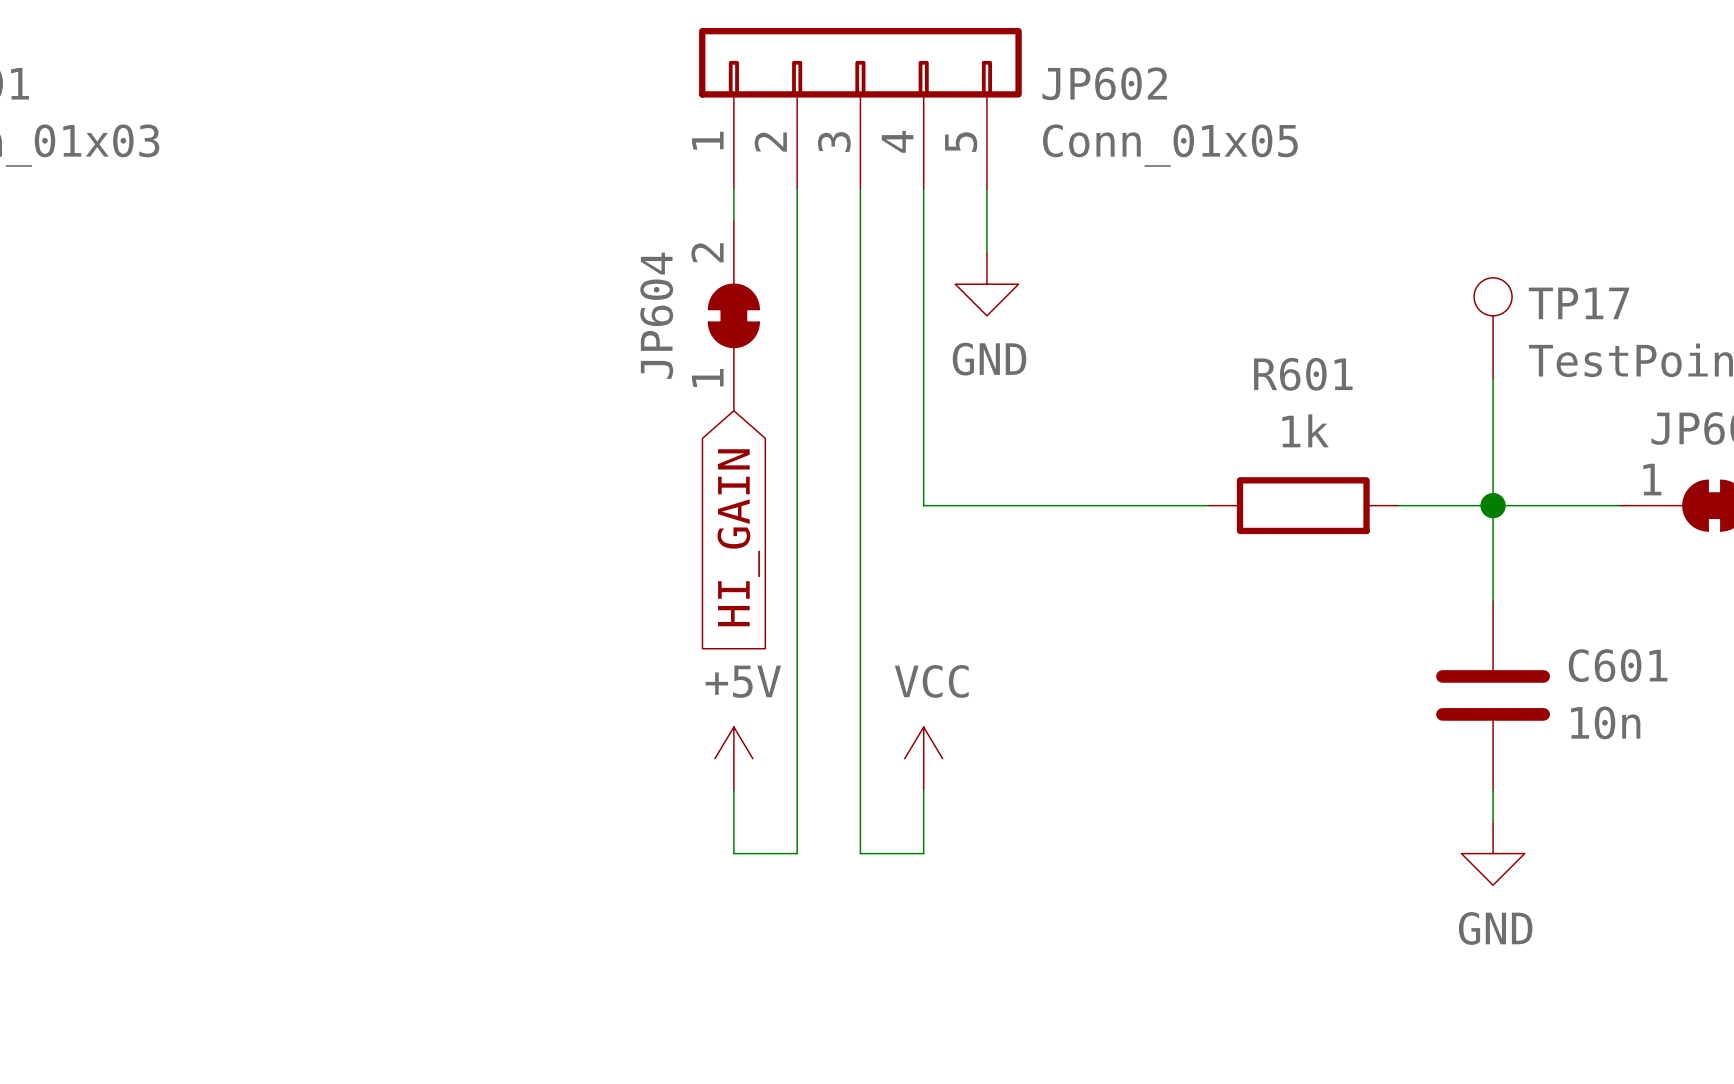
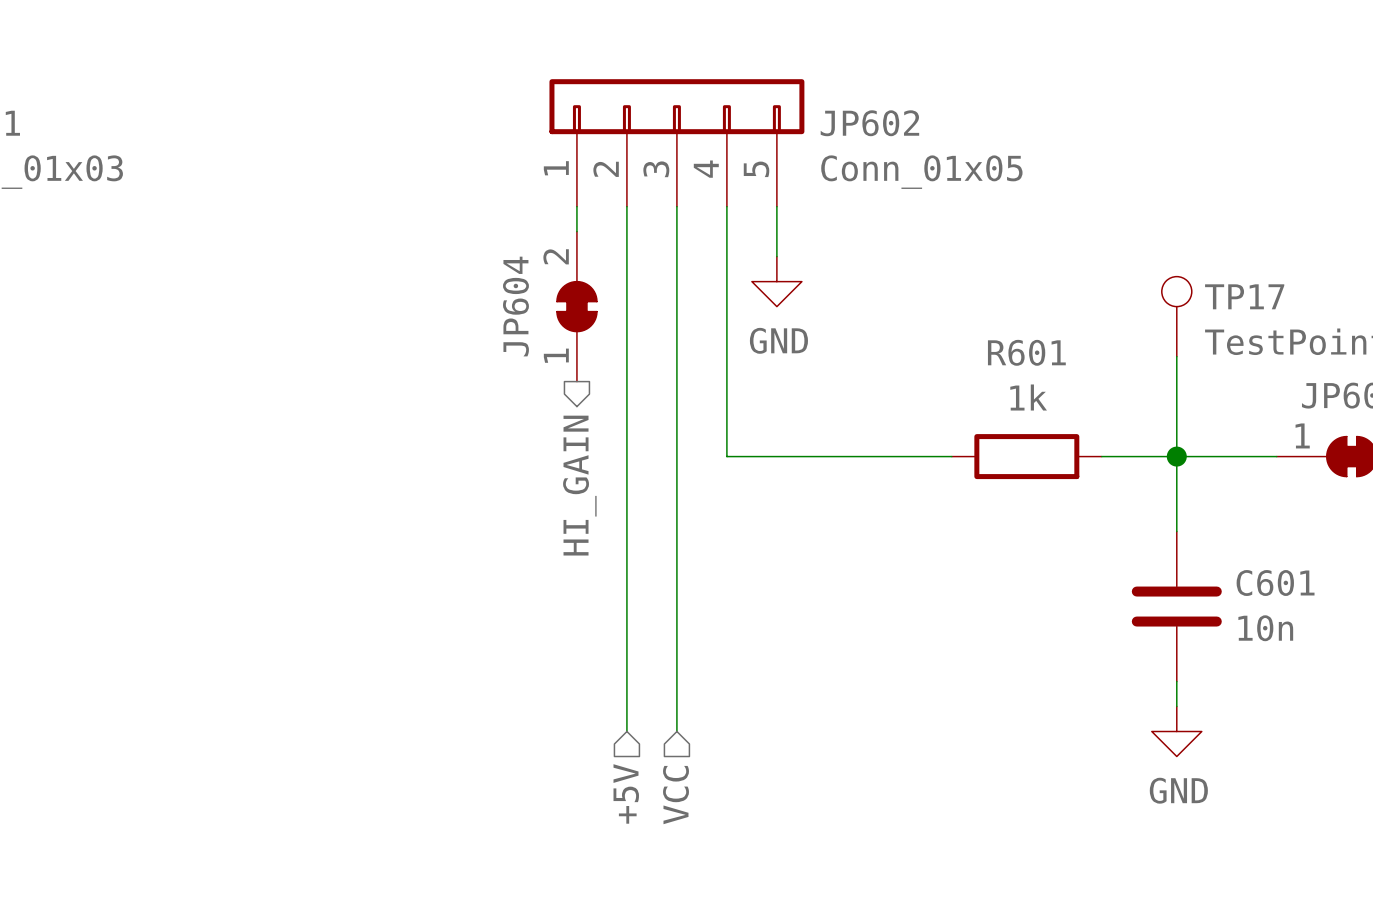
global label: HI_GAIN (738, 537) -> none
hierarchical label: none -> HI_GAIN (579, 485)
power symbol: +5V (733, 758) -> none
power symbol: VCC (923, 758) -> none
wire: (733, 790) (733, 853) (797, 853) -> none
wire: (923, 790) (923, 853) (860, 853) -> none
hierarchical label: none -> +5V (626, 793)
hierarchical label: none -> VCC (676, 795)

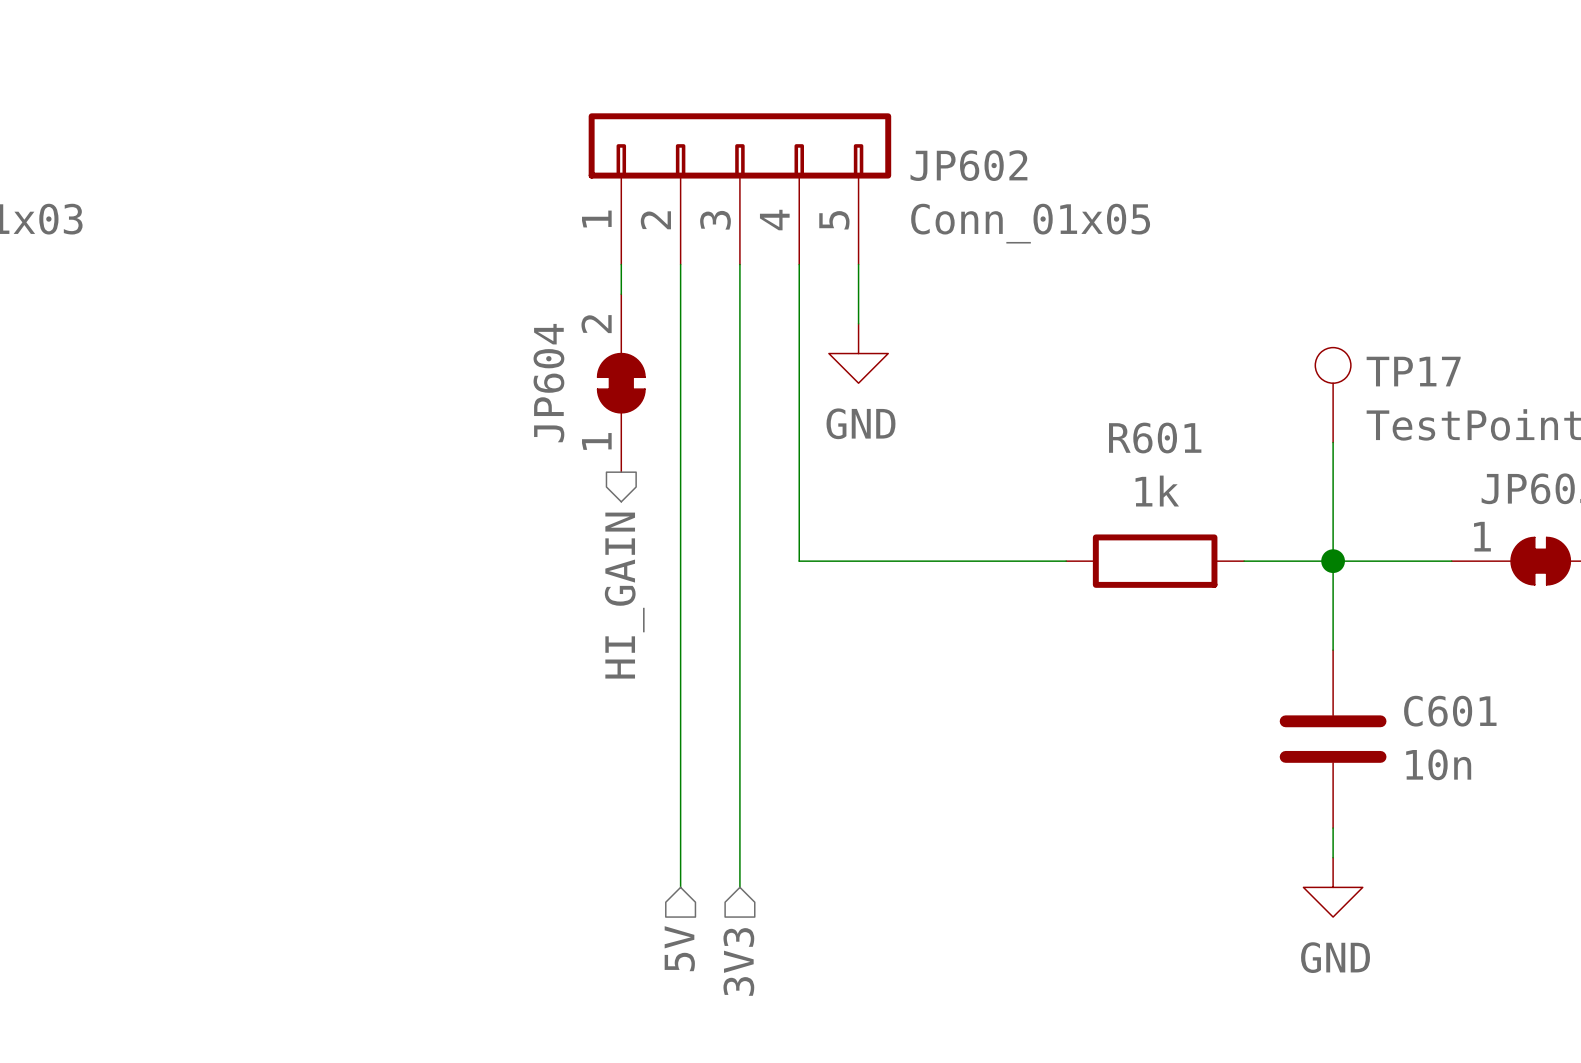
hierarchical label: +5V (626, 793) -> 5V (679, 948)
hierarchical label: VCC (676, 795) -> 3V3 (738, 961)

